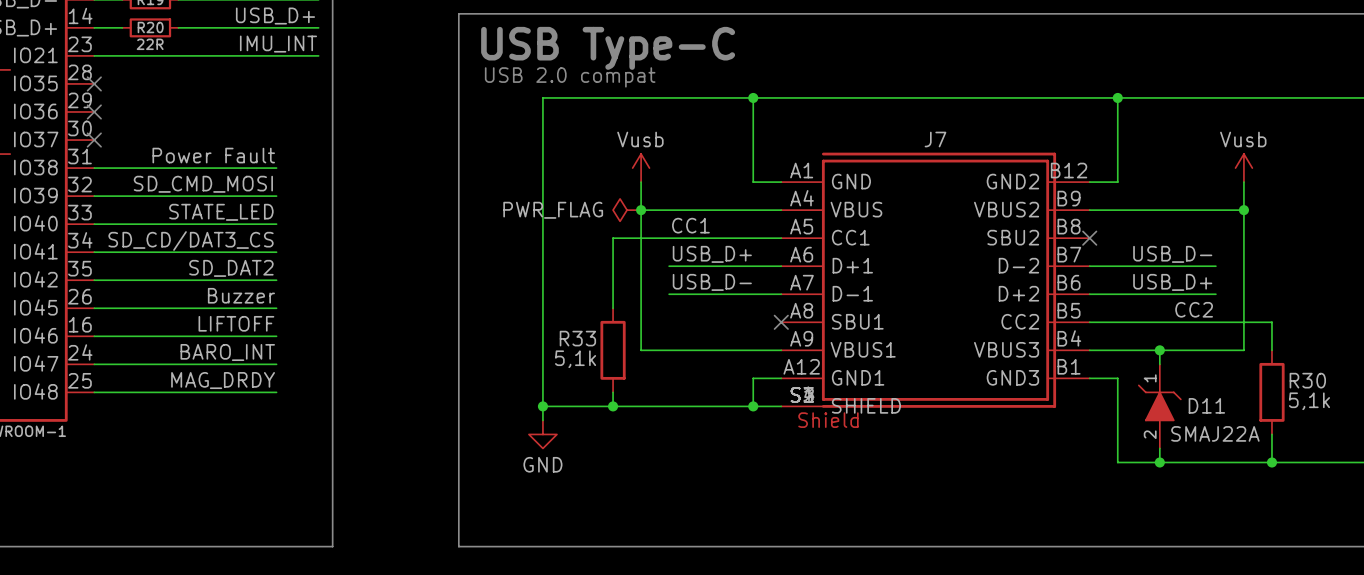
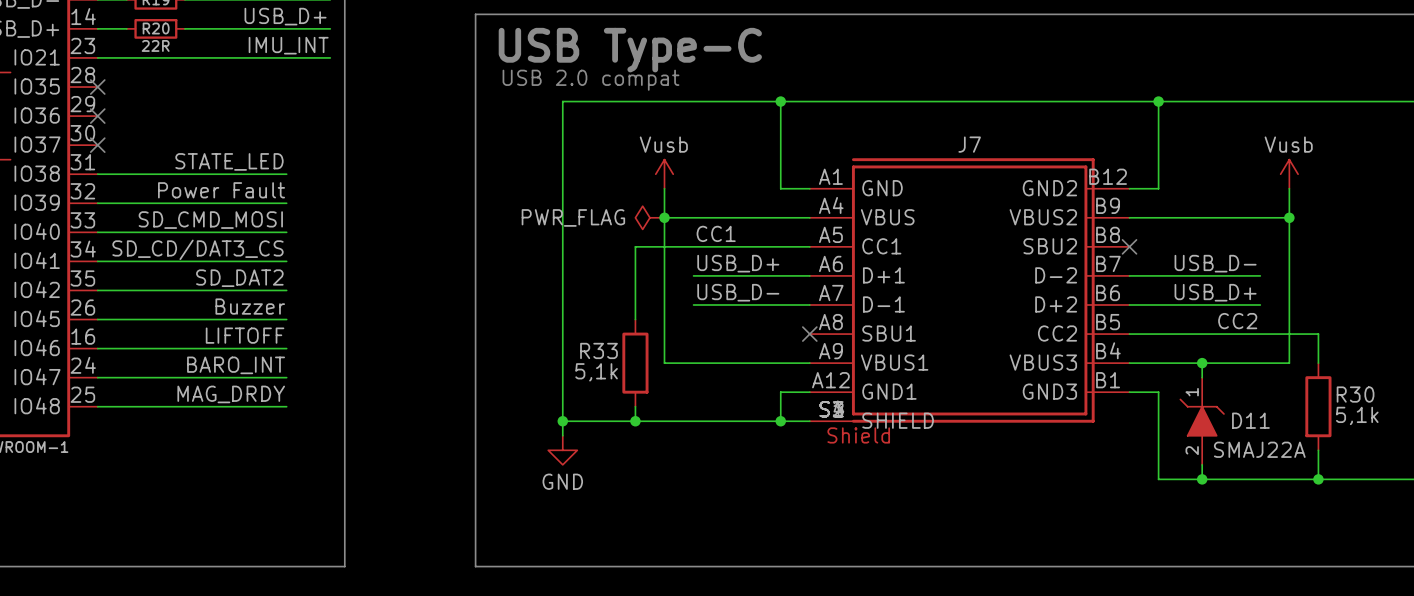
label: Power Fault (213, 155) -> STATE_LED (229, 161)
label: SD_CMD_MOSI (203, 184) -> Power Fault (221, 190)
label: STATE_LED (221, 212) -> SD_CMD_MOSI (210, 220)

